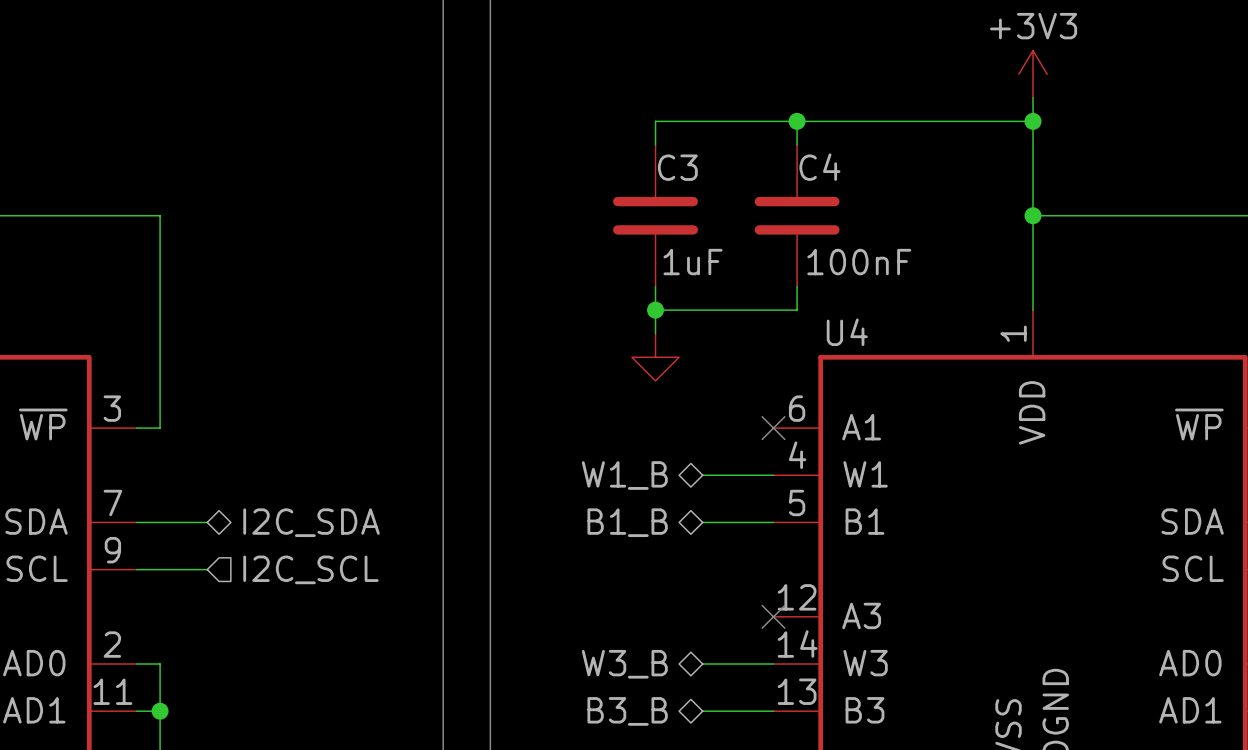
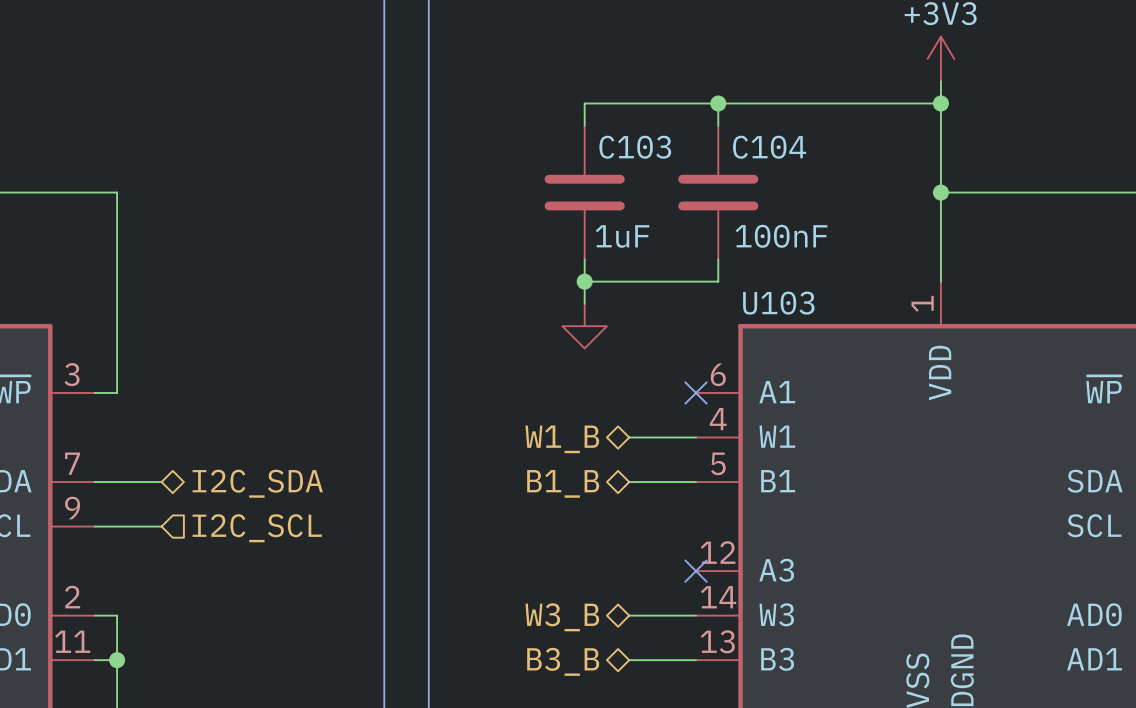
C3 name: C3 (677, 167) -> C103 (635, 147)
C4 name: C4 (819, 167) -> C104 (769, 147)
U4 name: U4 (847, 332) -> U103 (778, 303)

